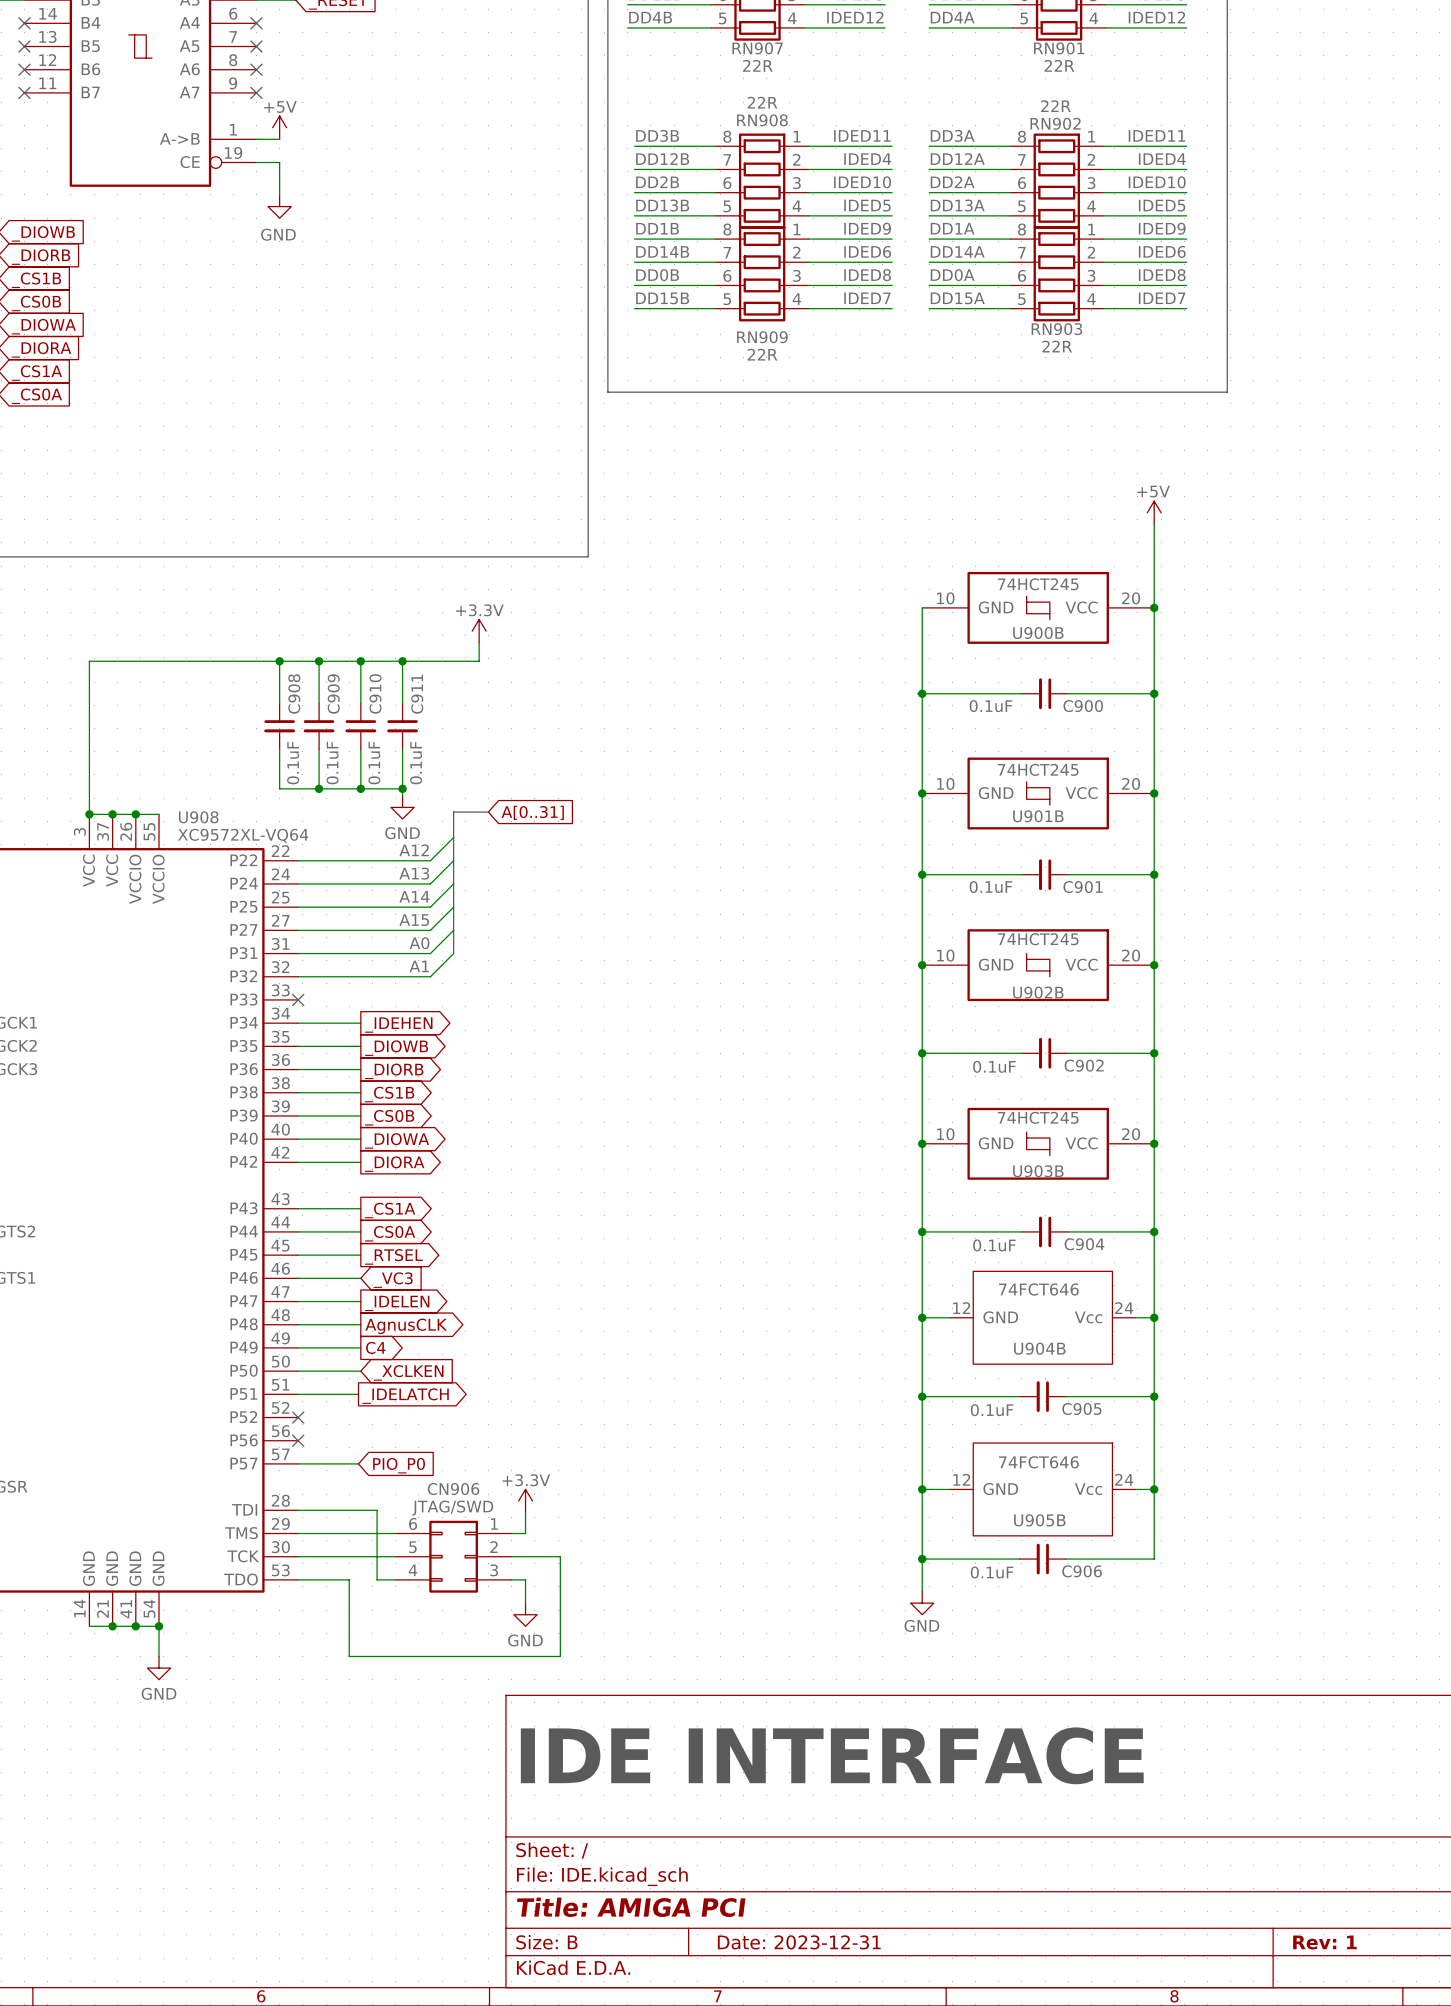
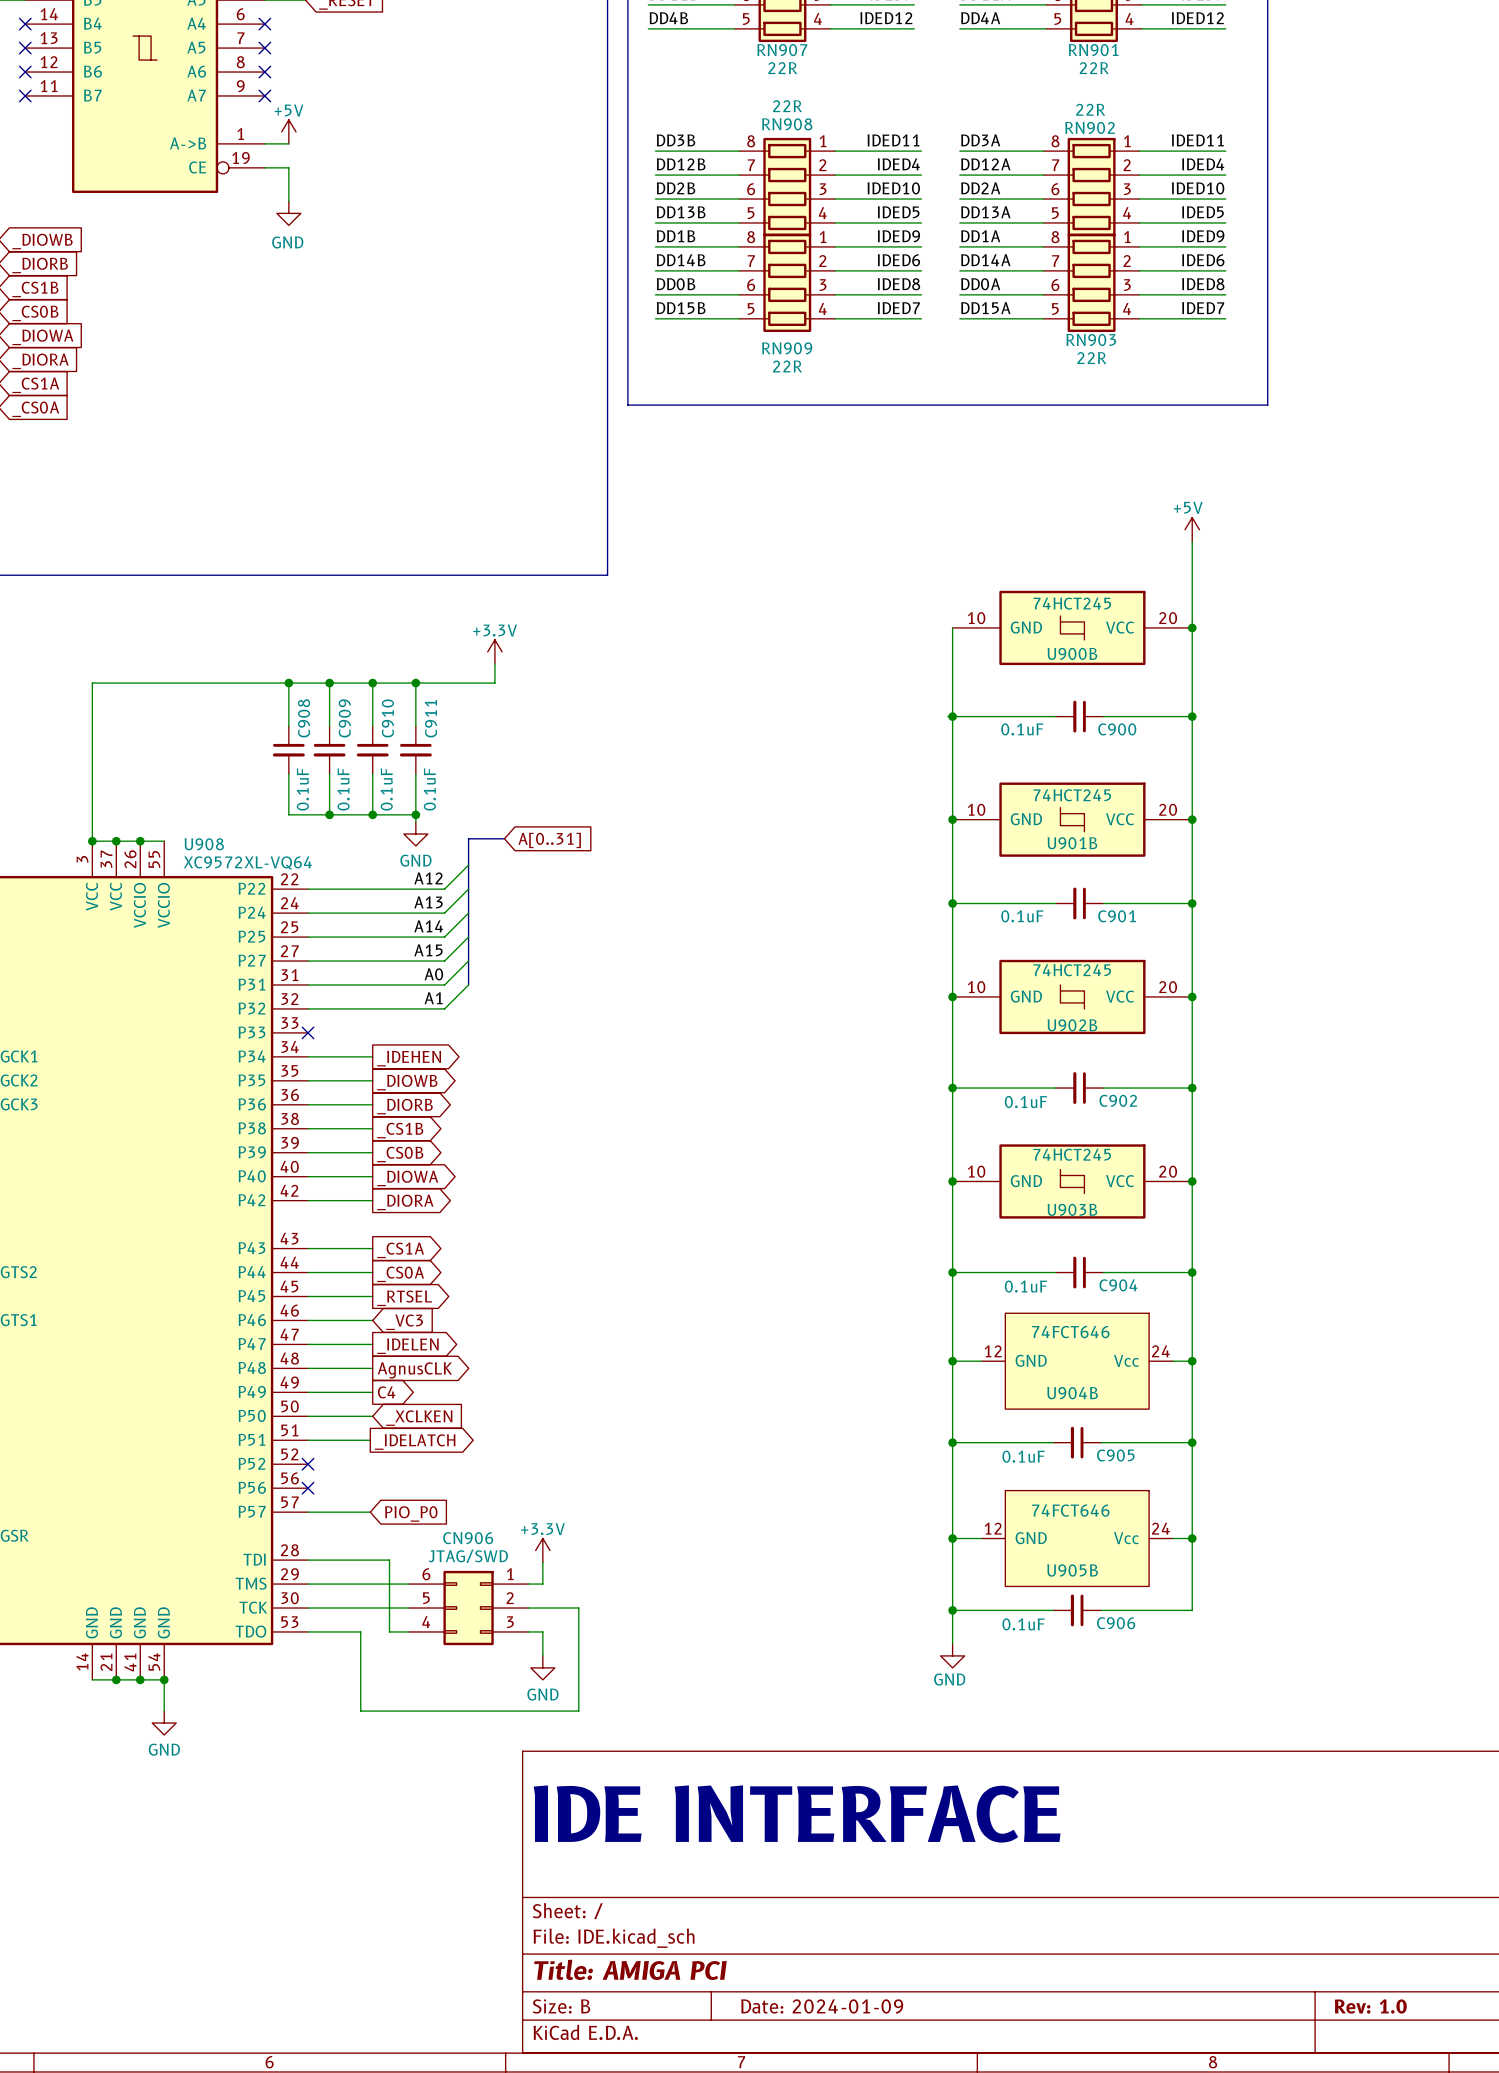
title block: Date: 2023-12-31 (799, 1942) -> Date: 2024-01-09 (822, 2006)
title block: Rev: 1 (1324, 1942) -> Rev: 1.0 (1370, 2006)

